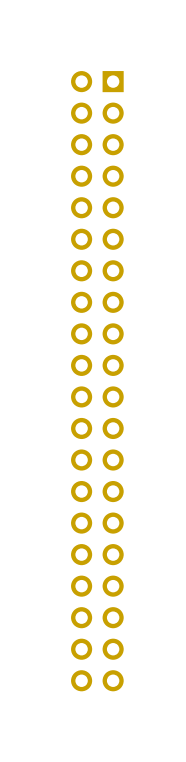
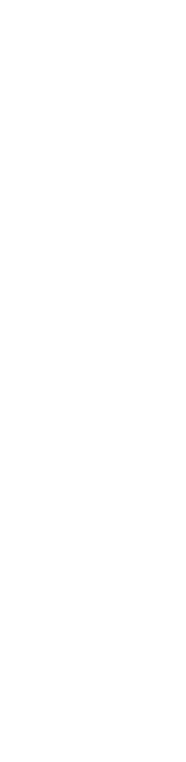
part: (97, 381) -> none

